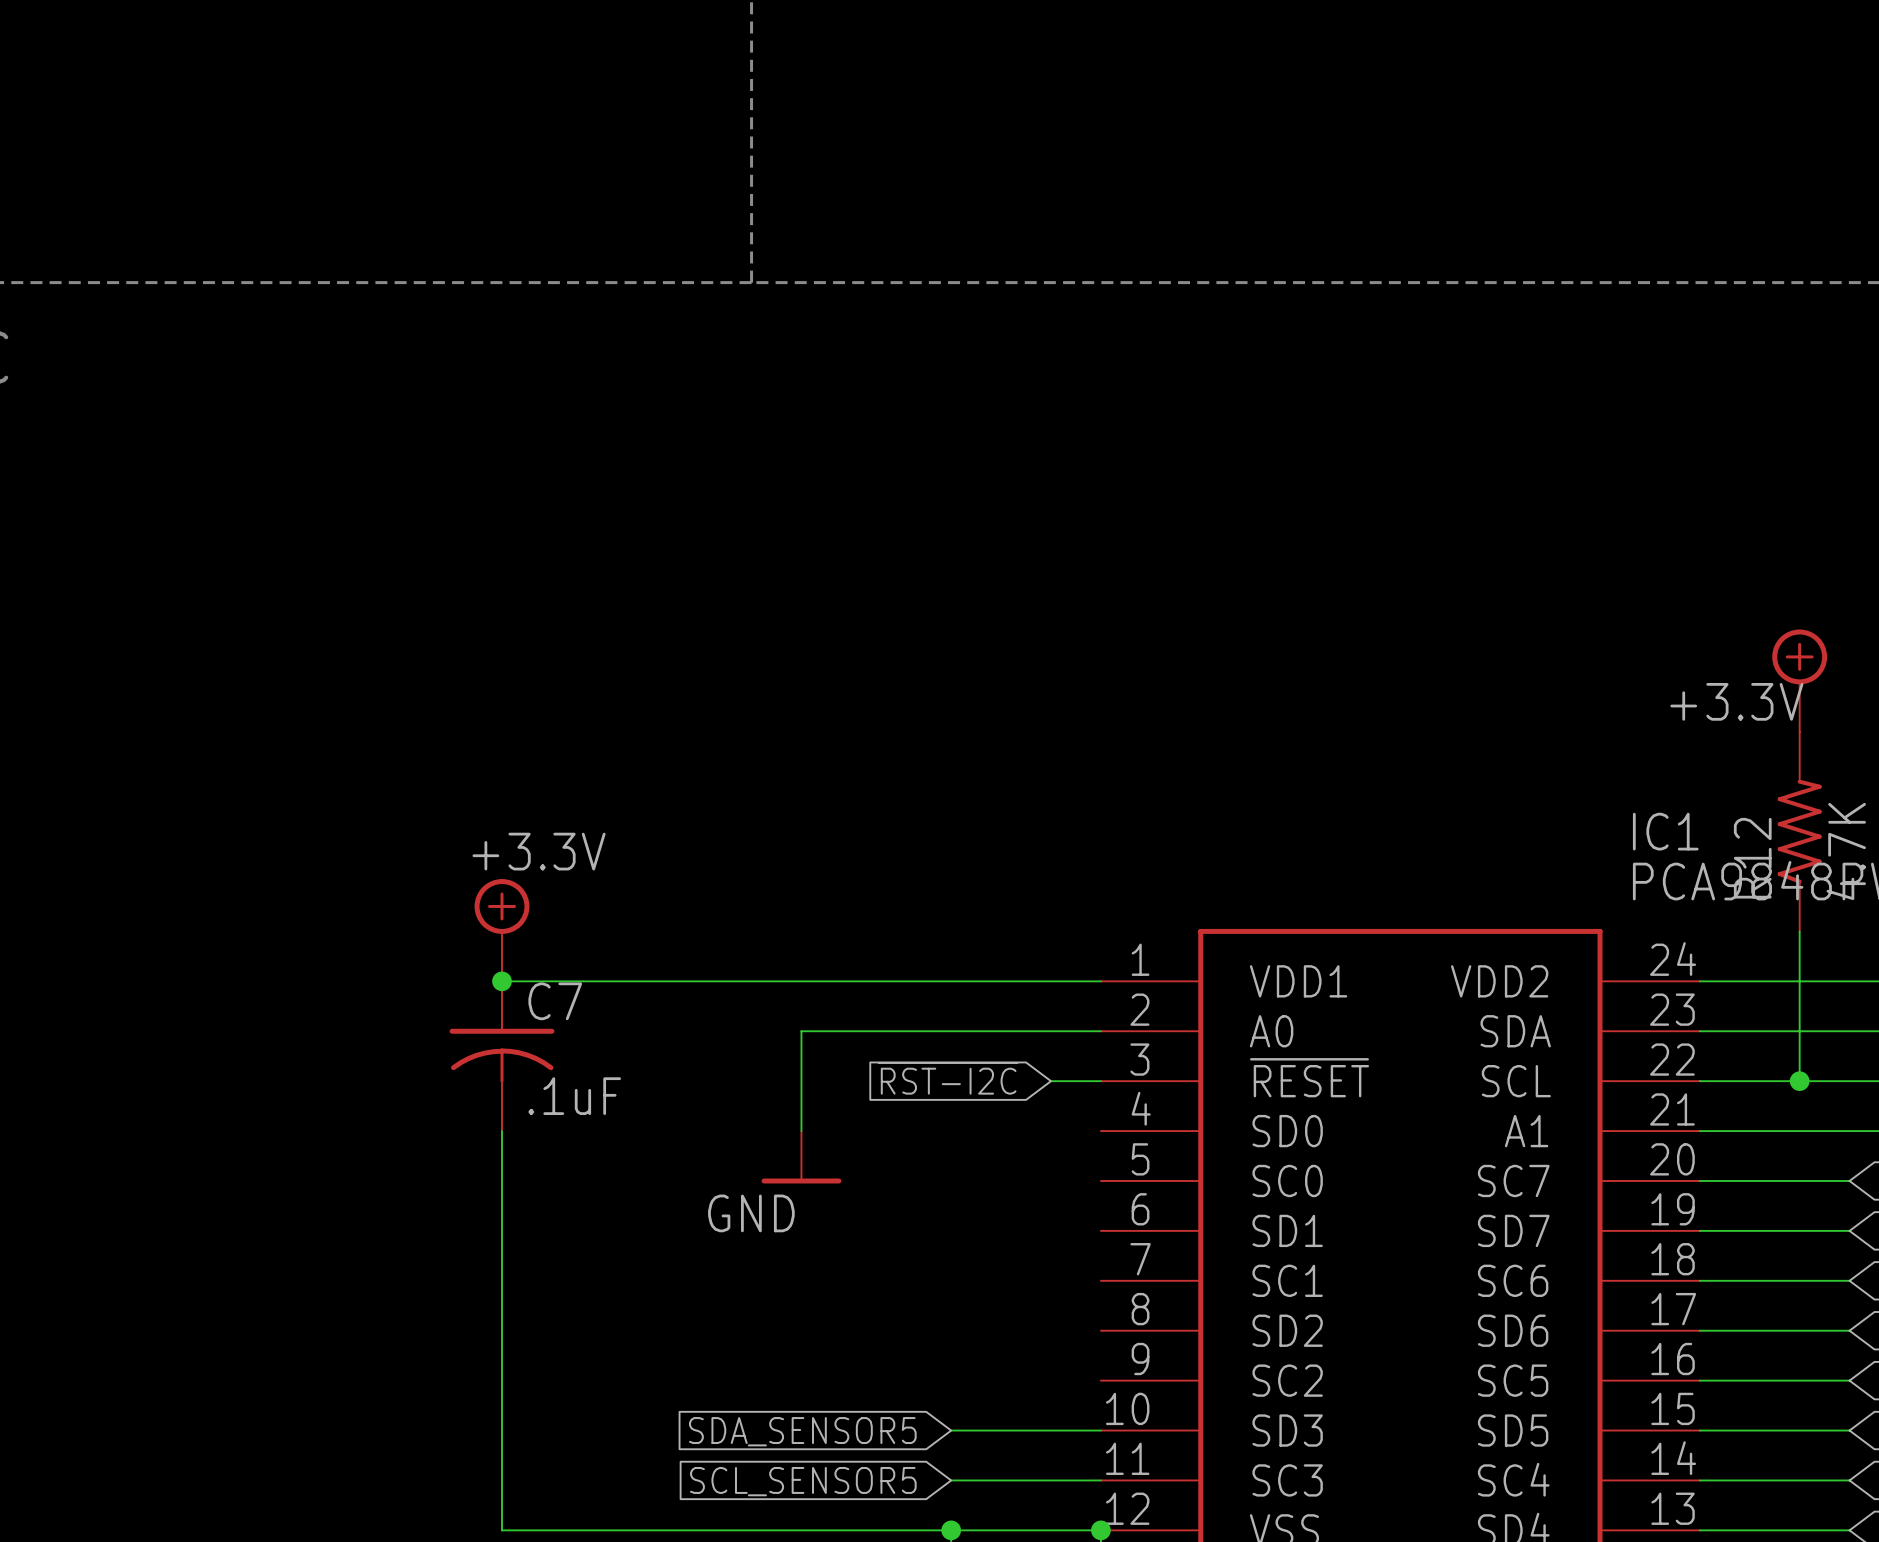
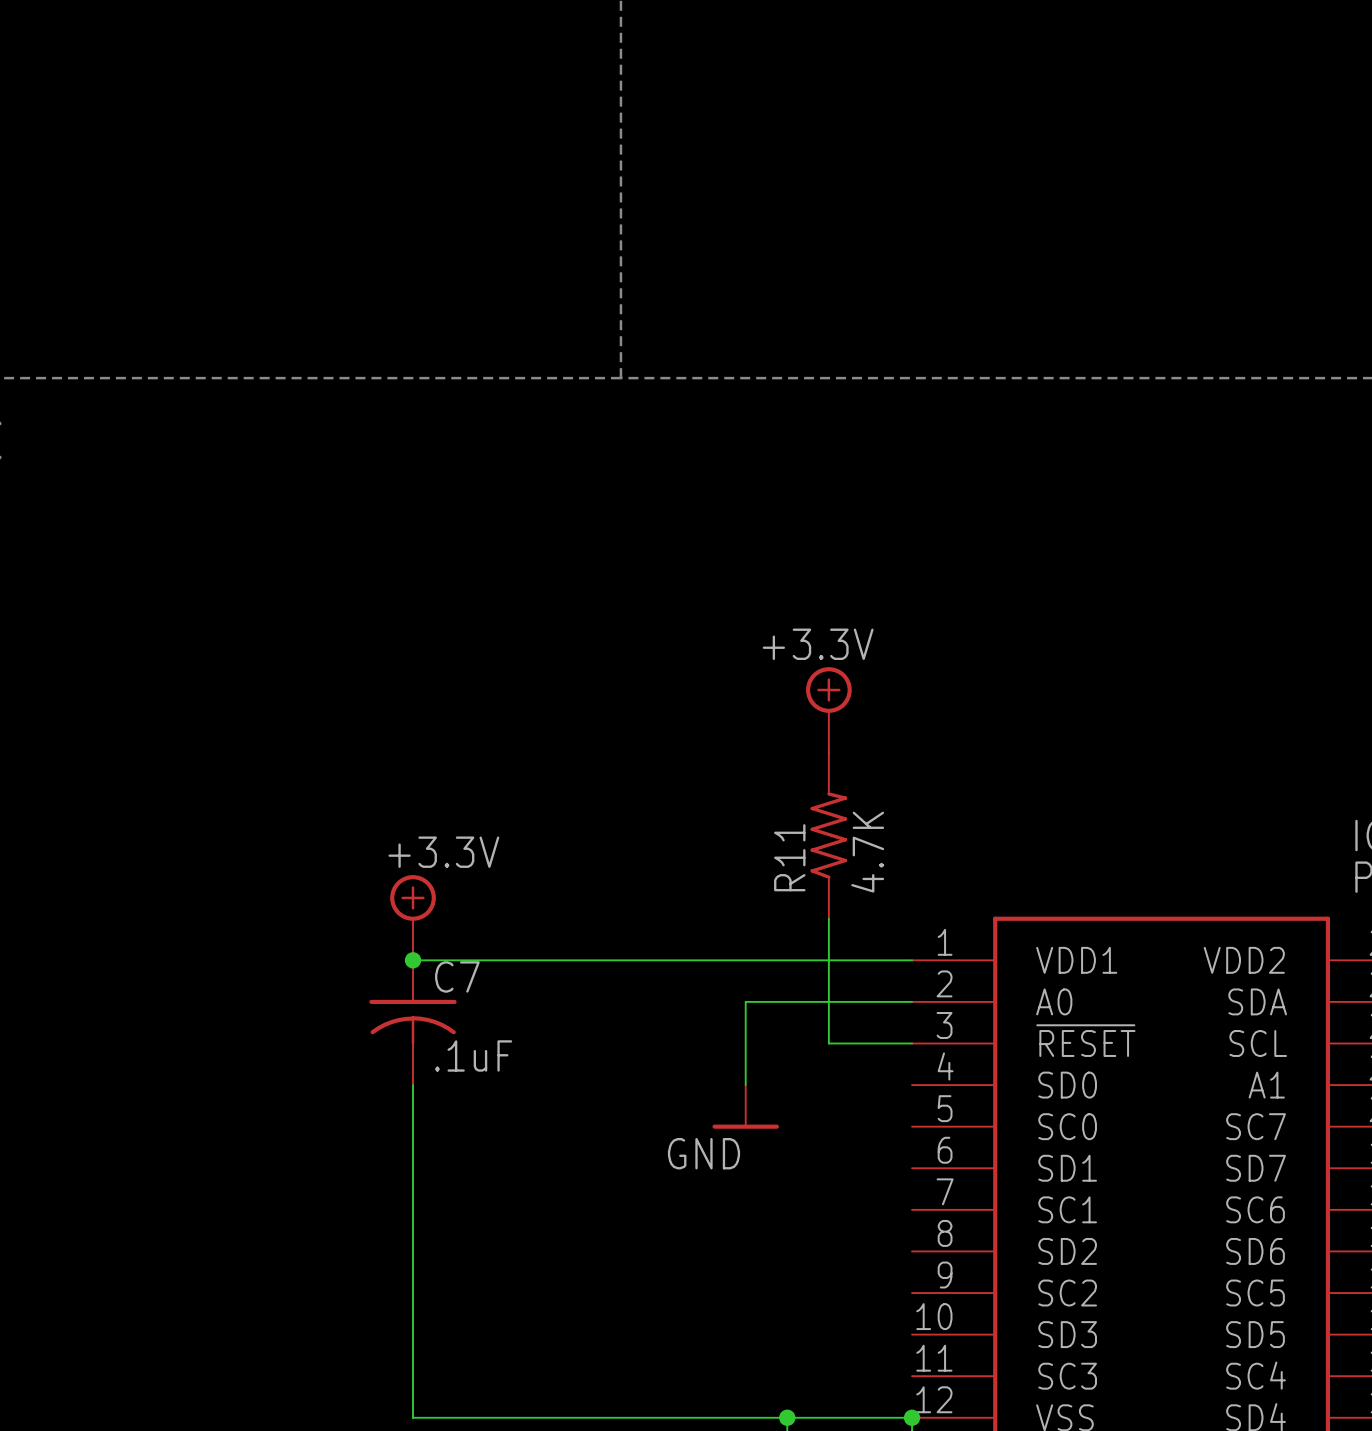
power symbol: none -> +3.3V (828, 709)
R11: none -> 4.7K (828, 835)
wire: none -> (828, 918) (828, 1043) (870, 1043)
wire: (901, 1031) (801, 1031) (801, 1131) -> (745, 1001) (745, 1085)
global label: ~{RST-I2C} (948, 1078) -> none
power symbol position: GND (801, 1157) -> GND (745, 1106)
wire: (951, 1430) (1100, 1430) -> none
global label: SDA_SENSOR5 (802, 1431) -> none
wire: (951, 1480) (1100, 1480) -> none
global label: SCL_SENSOR5 (803, 1481) -> none

